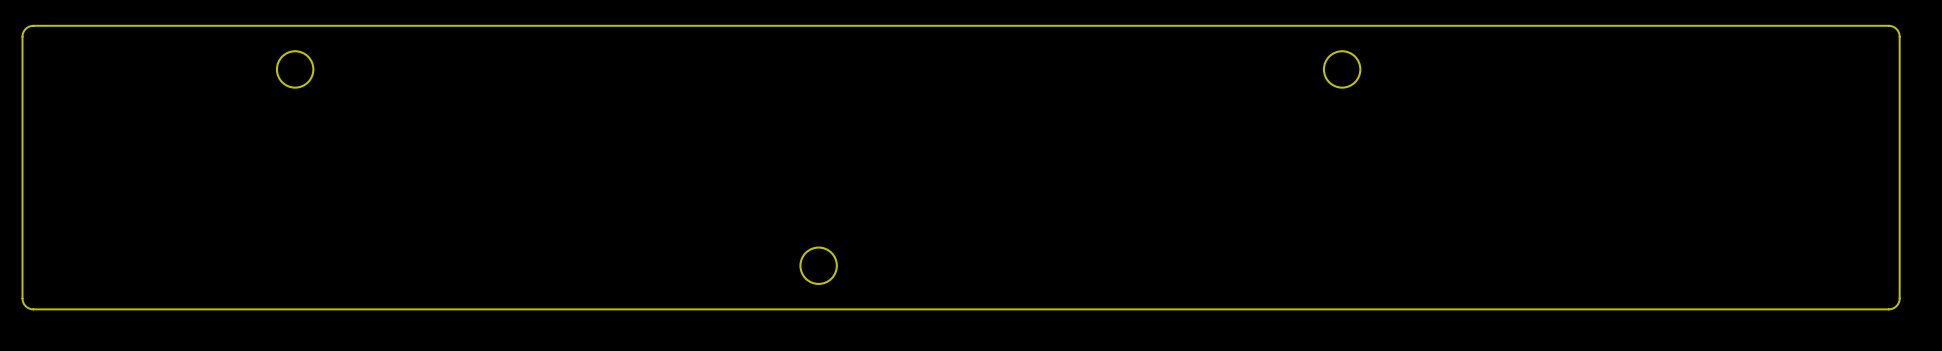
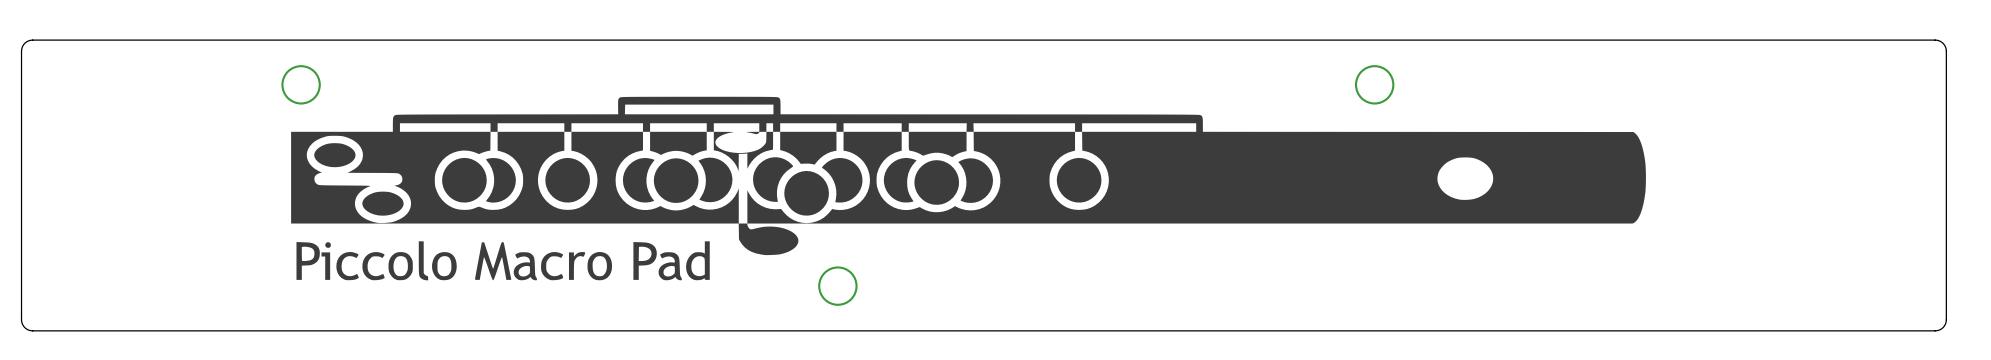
drawing: none -> [291, 96, 1646, 281]

